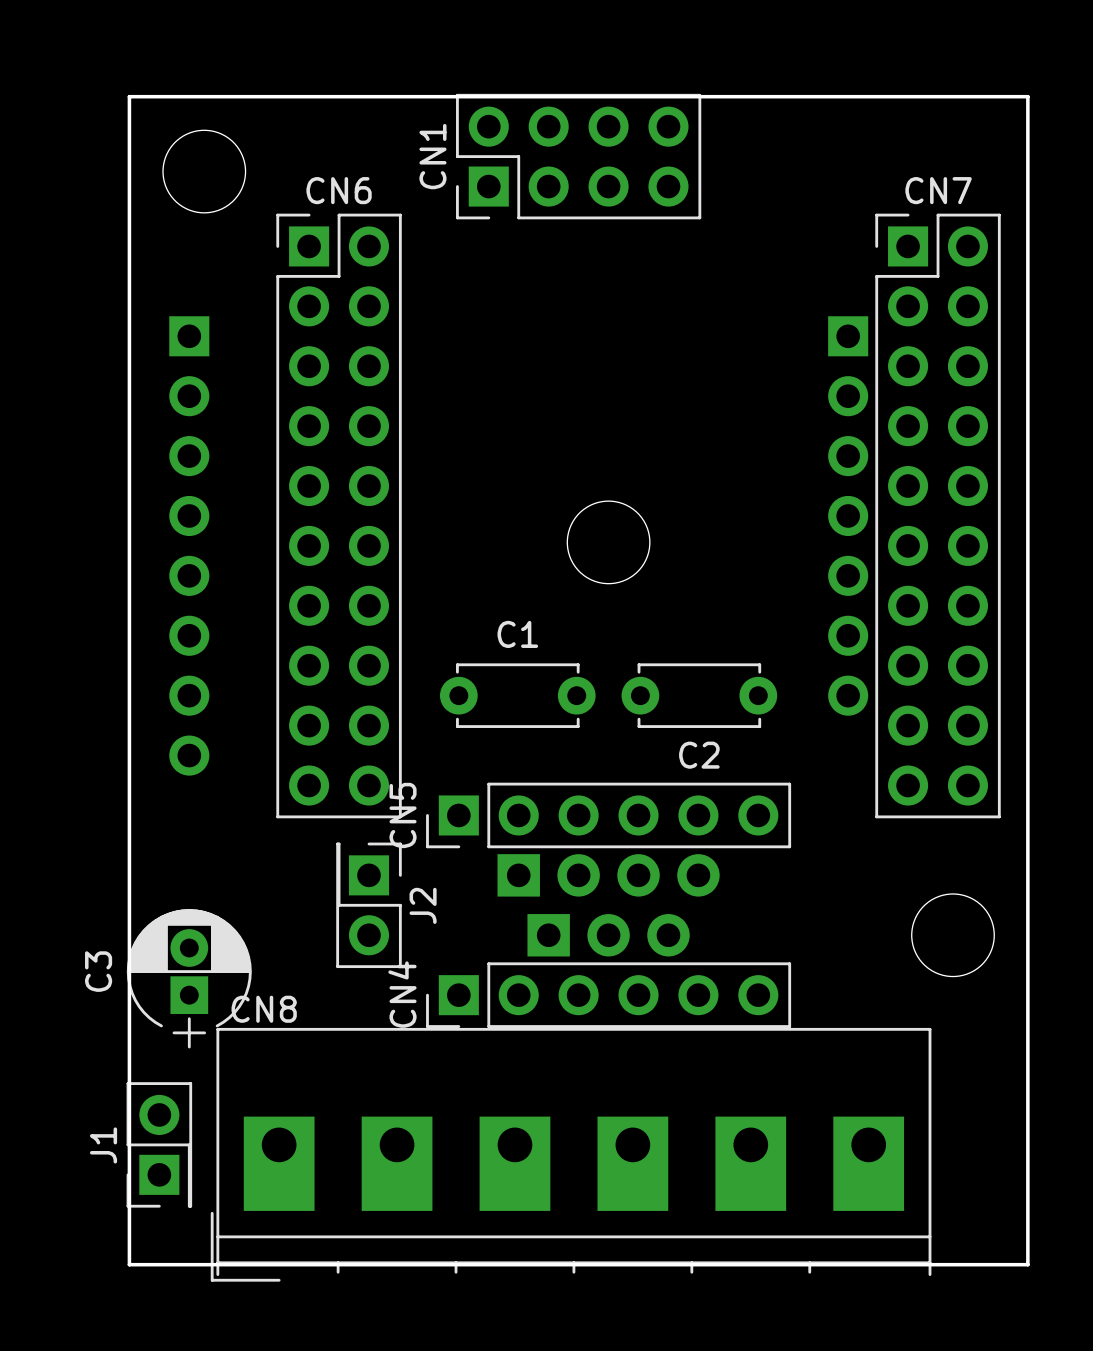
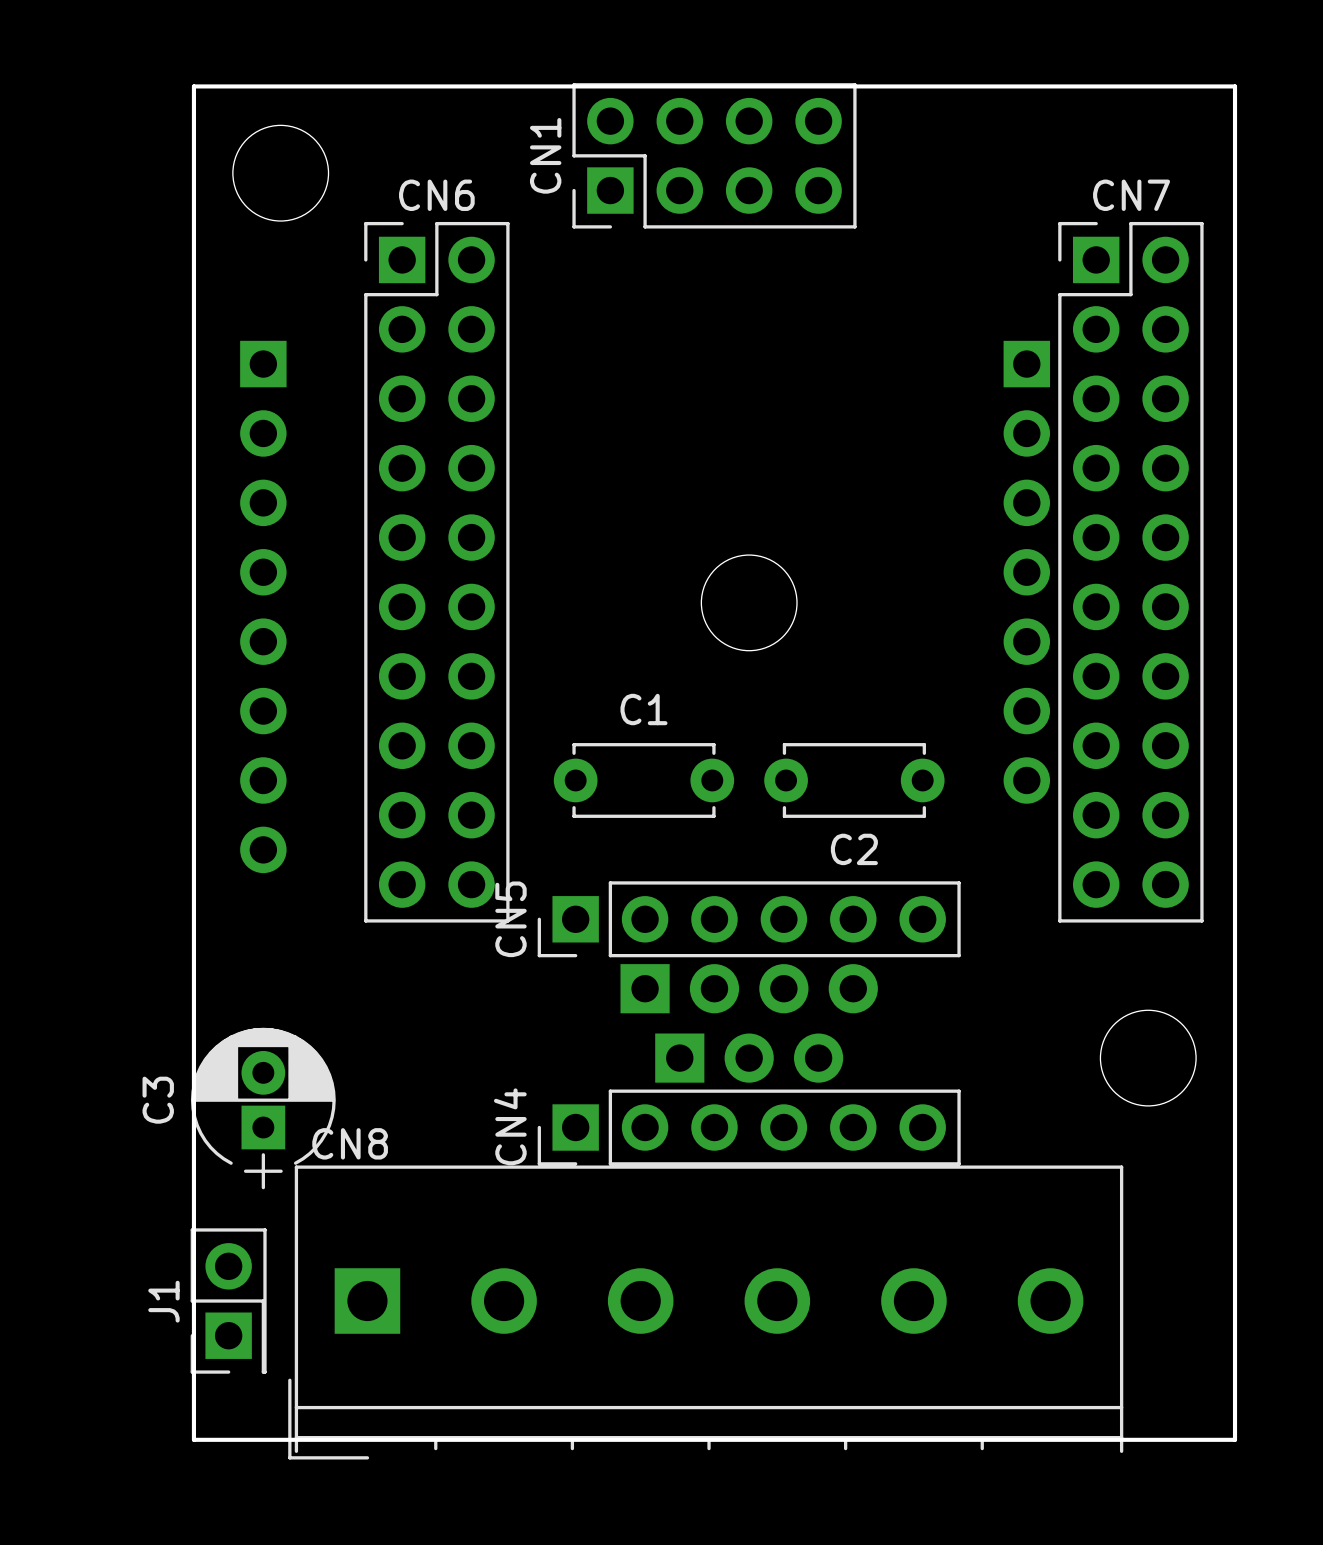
J2: (369, 905) -> none
CN8 footprint: [210, 1027, 932, 1282] -> [288, 1165, 1124, 1460]

